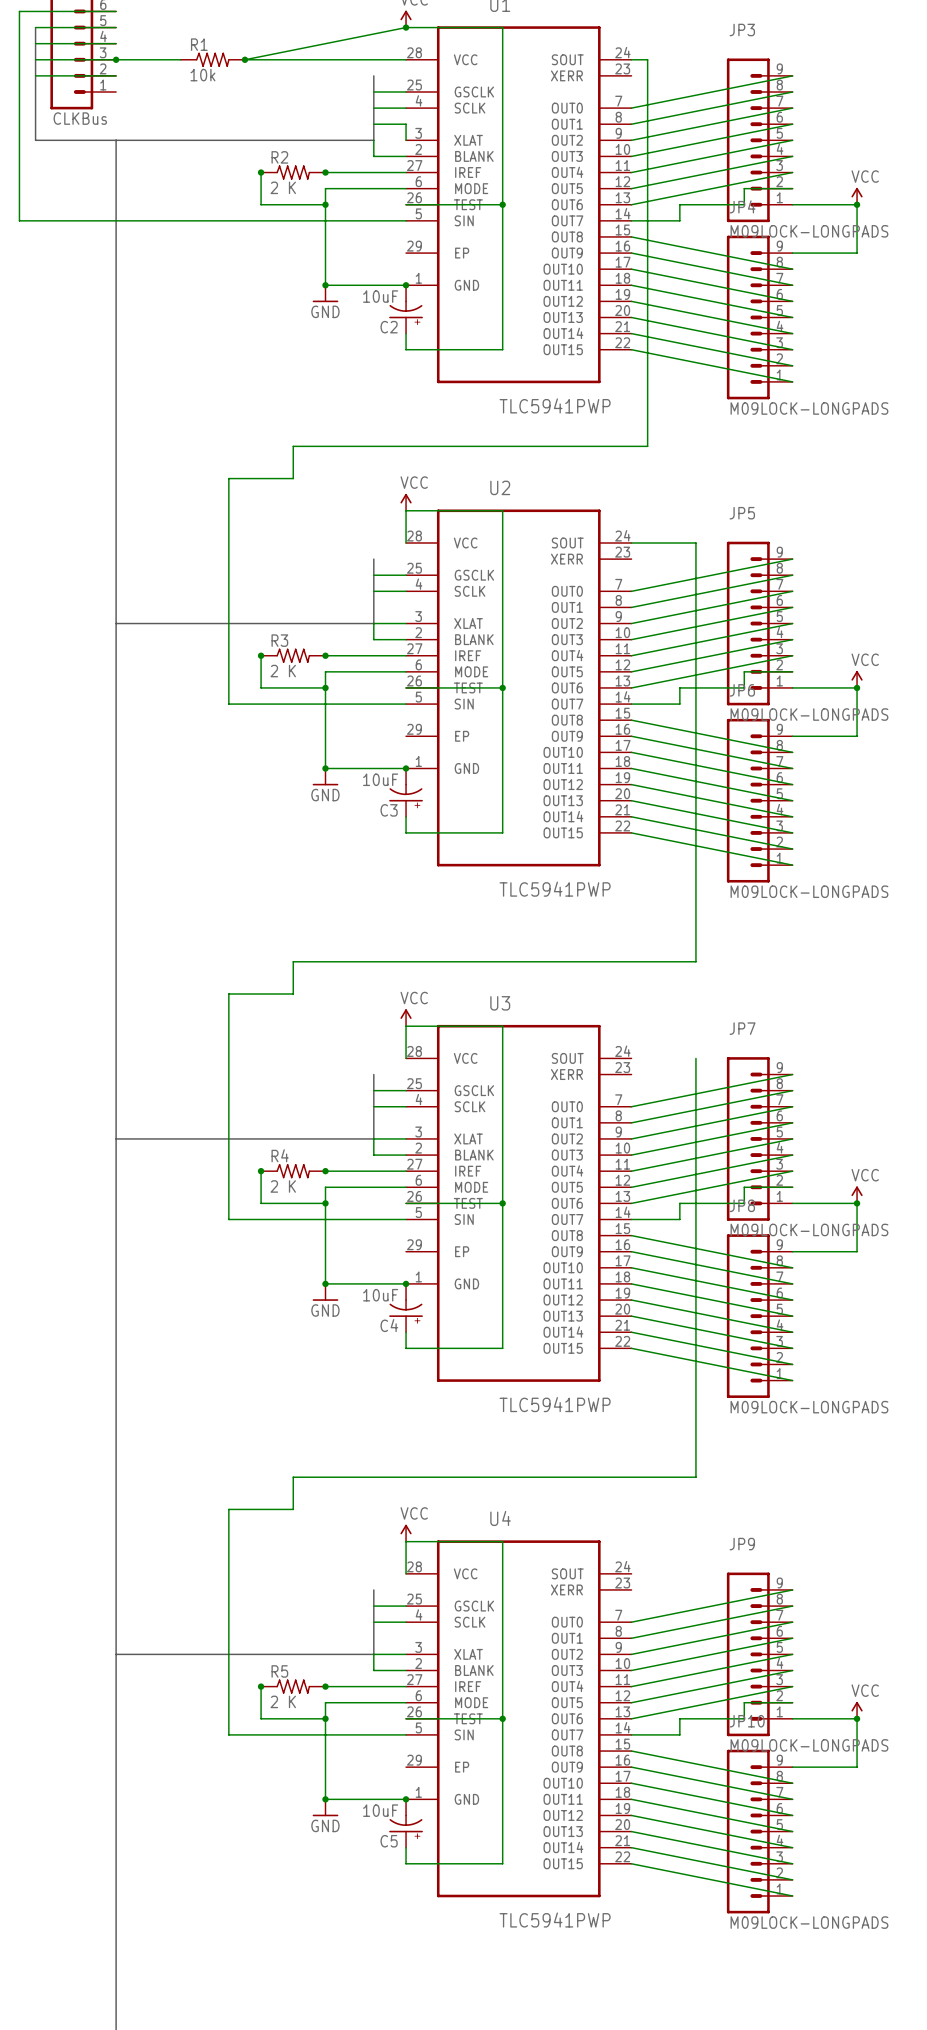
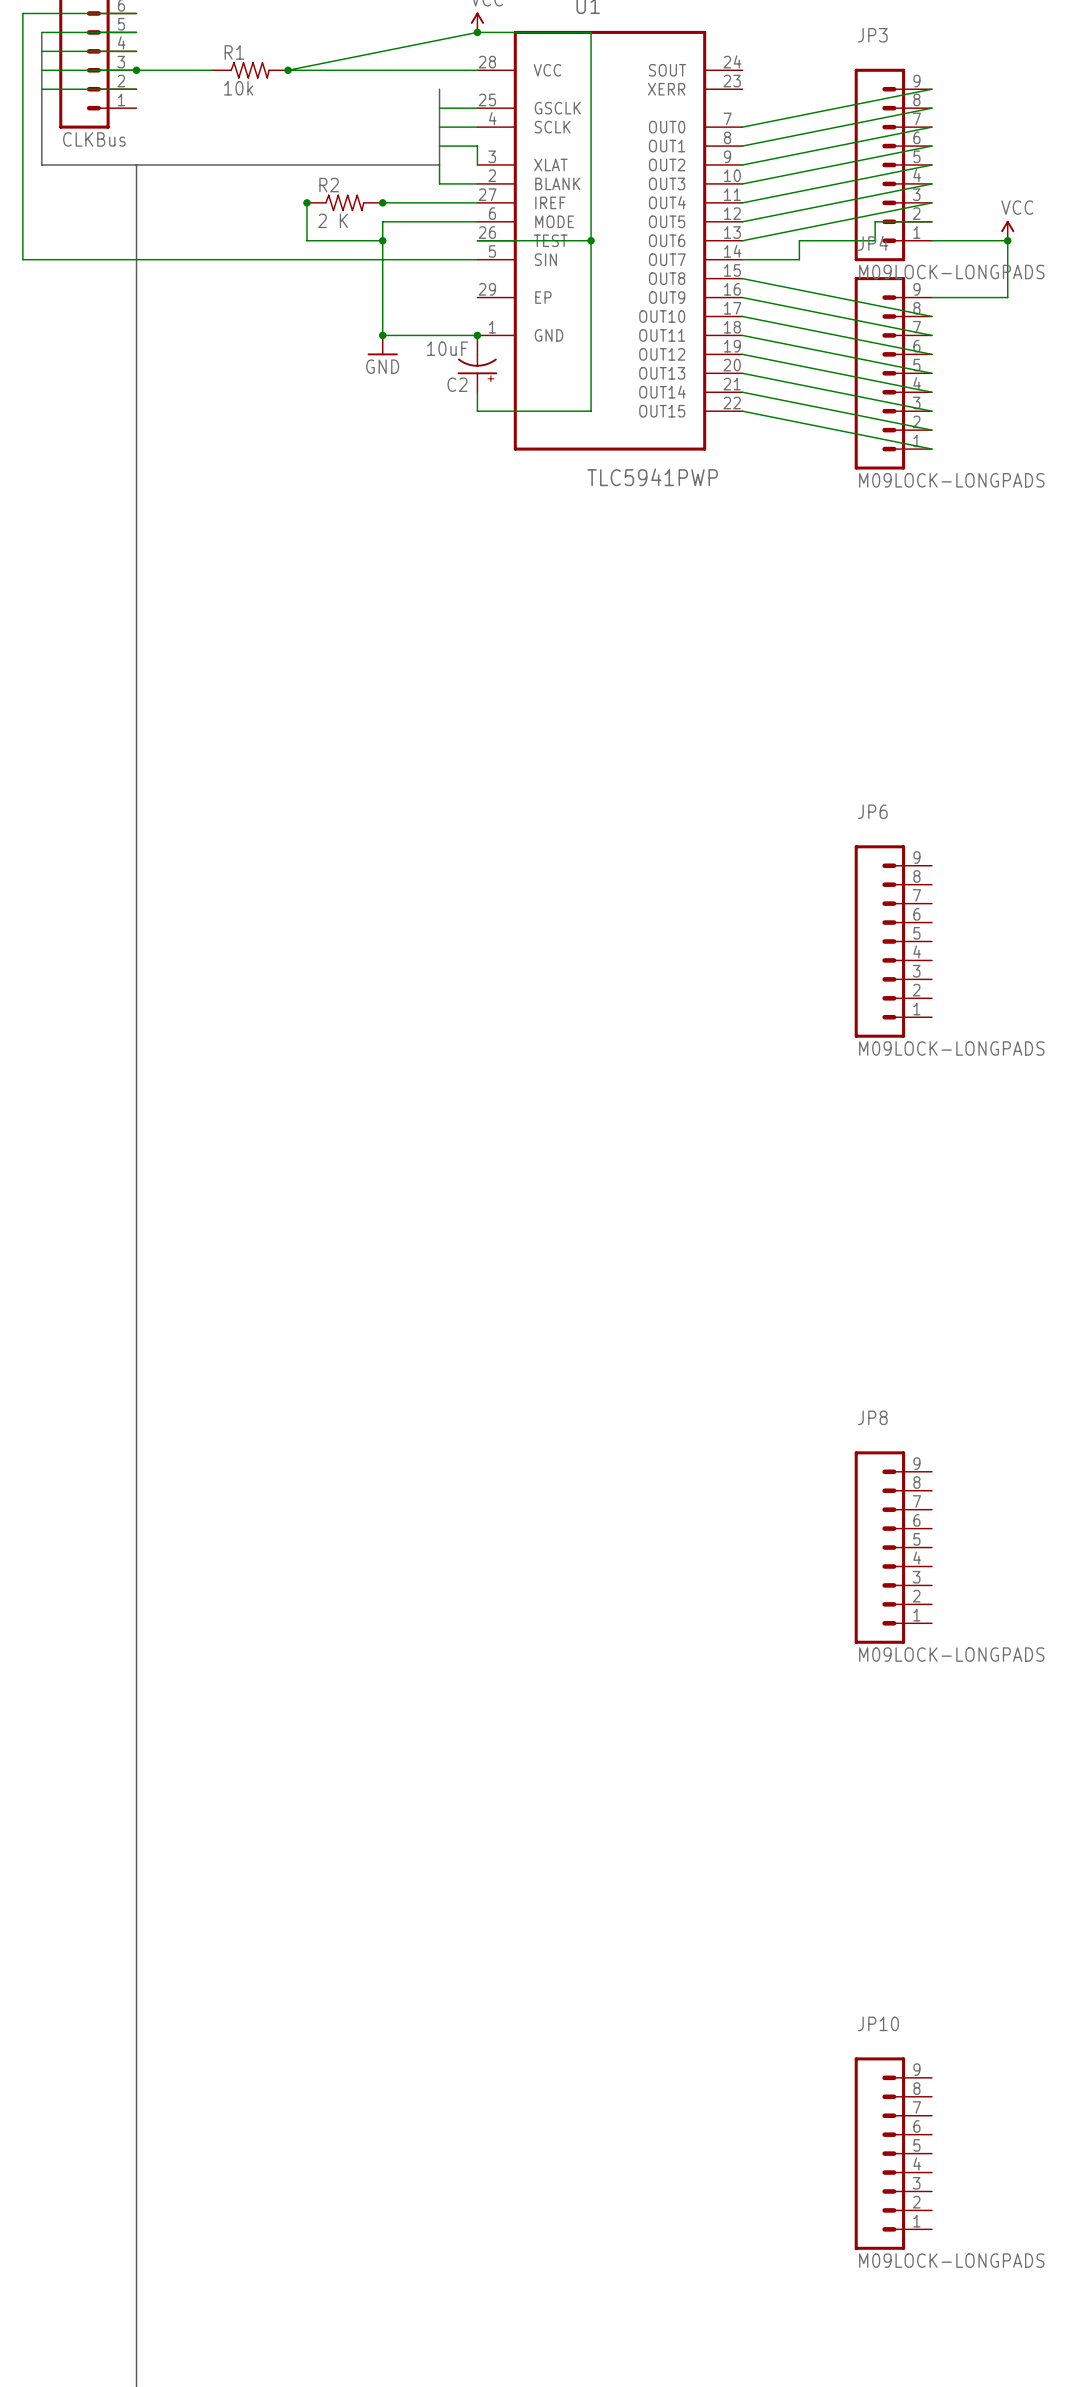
wire: (631, 59) (647, 59) (647, 446) (293, 446) (293, 478) (228, 478) (228, 704) (406, 704) -> none
power symbol: VCC (406, 502) -> none
wire: (406, 543) (406, 510) (502, 510) (502, 832) (406, 832) (406, 816) -> none
wire: (631, 543) (695, 543) (695, 961) (293, 961) (293, 994) (228, 994) (228, 1219) (406, 1219) -> none
bus: (373, 559) (373, 623) (116, 623) -> none
wire: (792, 559) (631, 591) -> none
wire: (373, 575) (406, 575) -> none
wire: (792, 575) (631, 607) -> none
wire: (373, 591) (406, 591) -> none
wire: (792, 591) (631, 623) -> none
wire: (792, 607) (631, 639) -> none
wire: (406, 623) (373, 623) (373, 639) (406, 639) -> none
JP5: M09LOCK-LONGPADS (759, 623) -> none
wire: (792, 623) (631, 655) -> none
wire: (792, 639) (631, 671) -> none
wire: (261, 655) (261, 687) (325, 687) -> none
junction: (261, 655) -> none
R3: 2 K (293, 655) -> none
wire: (325, 655) (406, 655) -> none
junction: (325, 655) -> none
wire: (792, 655) (631, 687) -> none
wire: (406, 671) (325, 671) (325, 768) (406, 768) -> none
wire: (792, 671) (744, 671) (744, 687) (679, 687) (679, 704) (631, 704) -> none
power symbol: VCC (857, 679) -> none
junction: (325, 687) -> none
wire: (406, 687) (502, 687) -> none
junction: (502, 687) -> none
U2: TLC5941PWP (518, 687) -> none
wire: (792, 687) (857, 687) (857, 736) (792, 736) -> none
junction: (857, 687) -> none
wire: (631, 720) (792, 752) -> none
wire: (631, 736) (792, 768) -> none
wire: (631, 752) (792, 784) -> none
junction: (325, 768) -> none
junction: (406, 768) -> none
wire: (631, 768) (792, 800) -> none
power symbol: GND (325, 776) -> none
wire: (631, 784) (792, 816) -> none
C3: 10uF (406, 792) -> none
wire: (631, 800) (792, 832) -> none
wire: (631, 816) (792, 849) -> none
wire: (631, 832) (792, 865) -> none
power symbol: VCC (406, 1017) -> none
wire: (406, 1058) (406, 1026) (502, 1026) (502, 1348) (406, 1348) (406, 1332) -> none
wire: (695, 1058) (695, 1477) (293, 1477) (293, 1509) (228, 1509) (228, 1734) (406, 1734) -> none
bus: (373, 1074) (373, 1138) (116, 1138) -> none
wire: (792, 1074) (631, 1106) -> none
wire: (373, 1090) (406, 1090) -> none
wire: (792, 1090) (631, 1122) -> none
wire: (373, 1106) (406, 1106) -> none
wire: (792, 1106) (631, 1138) -> none
wire: (792, 1122) (631, 1155) -> none
wire: (406, 1138) (373, 1138) (373, 1155) (406, 1155) -> none
JP7: M09LOCK-LONGPADS (759, 1138) -> none
wire: (792, 1138) (631, 1171) -> none
wire: (792, 1155) (631, 1187) -> none
wire: (261, 1171) (261, 1203) (325, 1203) -> none
junction: (261, 1171) -> none
R4: 2 K (293, 1171) -> none
wire: (325, 1171) (406, 1171) -> none
junction: (325, 1171) -> none
wire: (792, 1171) (631, 1203) -> none
wire: (406, 1187) (325, 1187) (325, 1283) (406, 1283) -> none
wire: (792, 1187) (744, 1187) (744, 1203) (679, 1203) (679, 1219) (631, 1219) -> none
power symbol: VCC (857, 1194) -> none
junction: (325, 1203) -> none
wire: (406, 1203) (502, 1203) -> none
junction: (502, 1203) -> none
U3: TLC5941PWP (518, 1203) -> none
wire: (792, 1203) (857, 1203) (857, 1251) (792, 1251) -> none
junction: (857, 1203) -> none
wire: (631, 1235) (792, 1267) -> none
wire: (631, 1251) (792, 1283) -> none
wire: (631, 1267) (792, 1300) -> none
junction: (325, 1283) -> none
junction: (406, 1283) -> none
wire: (631, 1283) (792, 1316) -> none
power symbol: GND (325, 1292) -> none
wire: (631, 1300) (792, 1332) -> none
C4: 10uF (406, 1308) -> none
wire: (631, 1316) (792, 1348) -> none
wire: (631, 1332) (792, 1364) -> none
wire: (631, 1348) (792, 1380) -> none
power symbol: VCC (406, 1533) -> none
wire: (406, 1573) (406, 1541) (502, 1541) (502, 1863) (406, 1863) (406, 1847) -> none
bus: (373, 1589) (373, 1654) (116, 1654) -> none
wire: (792, 1589) (631, 1622) -> none
wire: (373, 1606) (406, 1606) -> none
wire: (792, 1606) (631, 1638) -> none
wire: (373, 1622) (406, 1622) -> none
wire: (792, 1622) (631, 1654) -> none
wire: (792, 1638) (631, 1670) -> none
wire: (406, 1654) (373, 1654) (373, 1670) (406, 1670) -> none
JP9: M09LOCK-LONGPADS (759, 1654) -> none
wire: (792, 1654) (631, 1686) -> none
wire: (792, 1670) (631, 1702) -> none
wire: (261, 1686) (261, 1718) (325, 1718) -> none
junction: (261, 1686) -> none
R5: 2 K (293, 1686) -> none
wire: (325, 1686) (406, 1686) -> none
junction: (325, 1686) -> none
wire: (792, 1686) (631, 1718) -> none
wire: (406, 1702) (325, 1702) (325, 1799) (406, 1799) -> none
wire: (792, 1702) (744, 1702) (744, 1718) (679, 1718) (679, 1734) (631, 1734) -> none
power symbol: VCC (857, 1710) -> none
junction: (325, 1718) -> none
wire: (406, 1718) (502, 1718) -> none
junction: (502, 1718) -> none
U4: TLC5941PWP (518, 1718) -> none
wire: (792, 1718) (857, 1718) (857, 1767) (792, 1767) -> none
junction: (857, 1718) -> none
wire: (631, 1751) (792, 1783) -> none
wire: (631, 1767) (792, 1799) -> none
wire: (631, 1783) (792, 1815) -> none
junction: (325, 1799) -> none
junction: (406, 1799) -> none
wire: (631, 1799) (792, 1831) -> none
power symbol: GND (325, 1807) -> none
wire: (631, 1815) (792, 1847) -> none
C5: 10uF (406, 1823) -> none
wire: (631, 1831) (792, 1863) -> none
wire: (631, 1847) (792, 1879) -> none
wire: (631, 1863) (792, 1896) -> none

